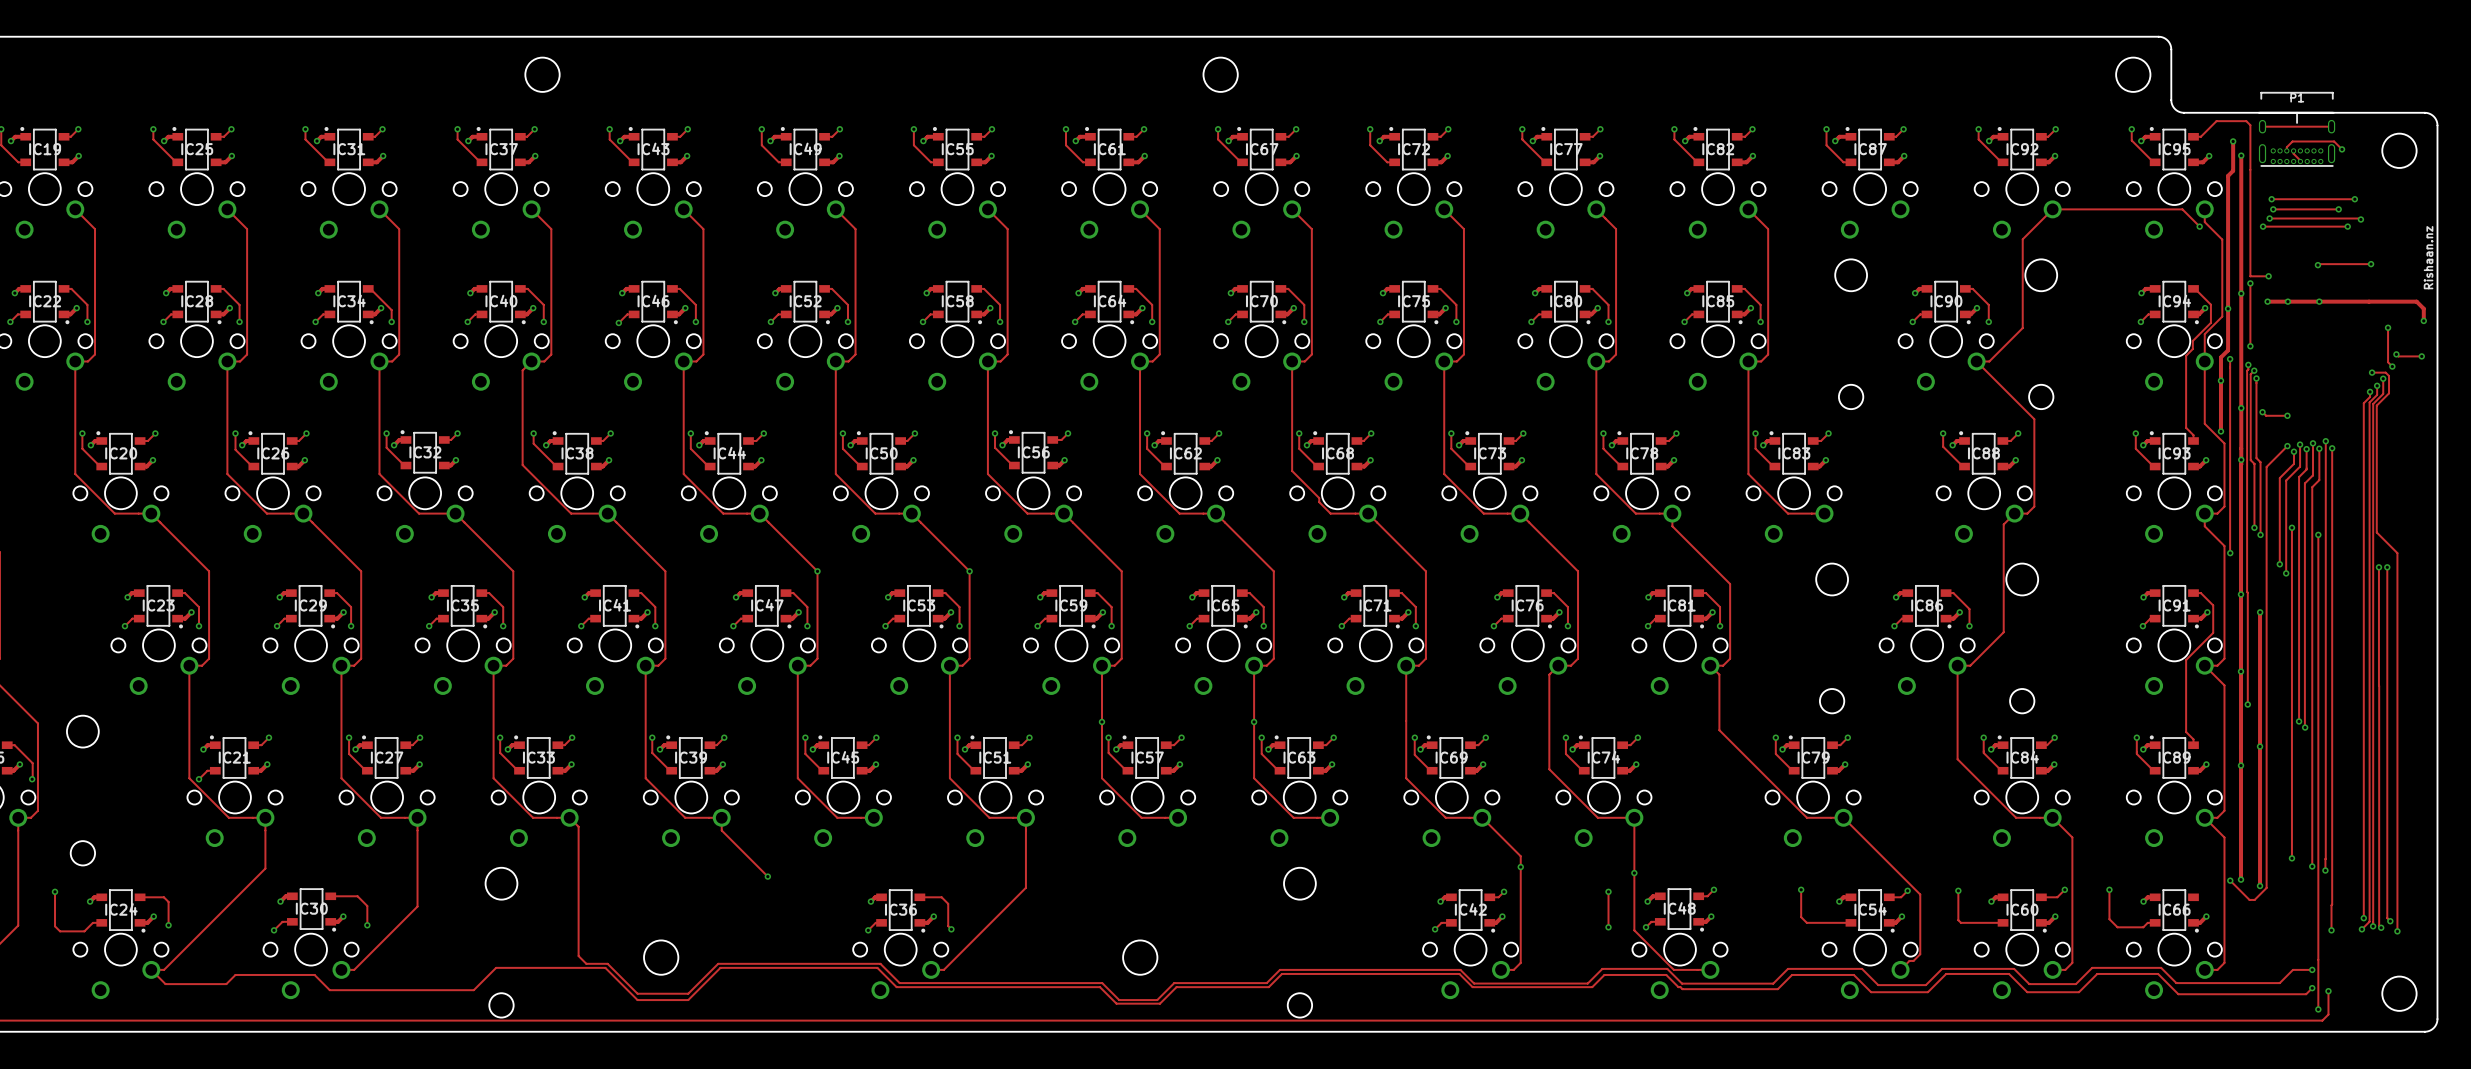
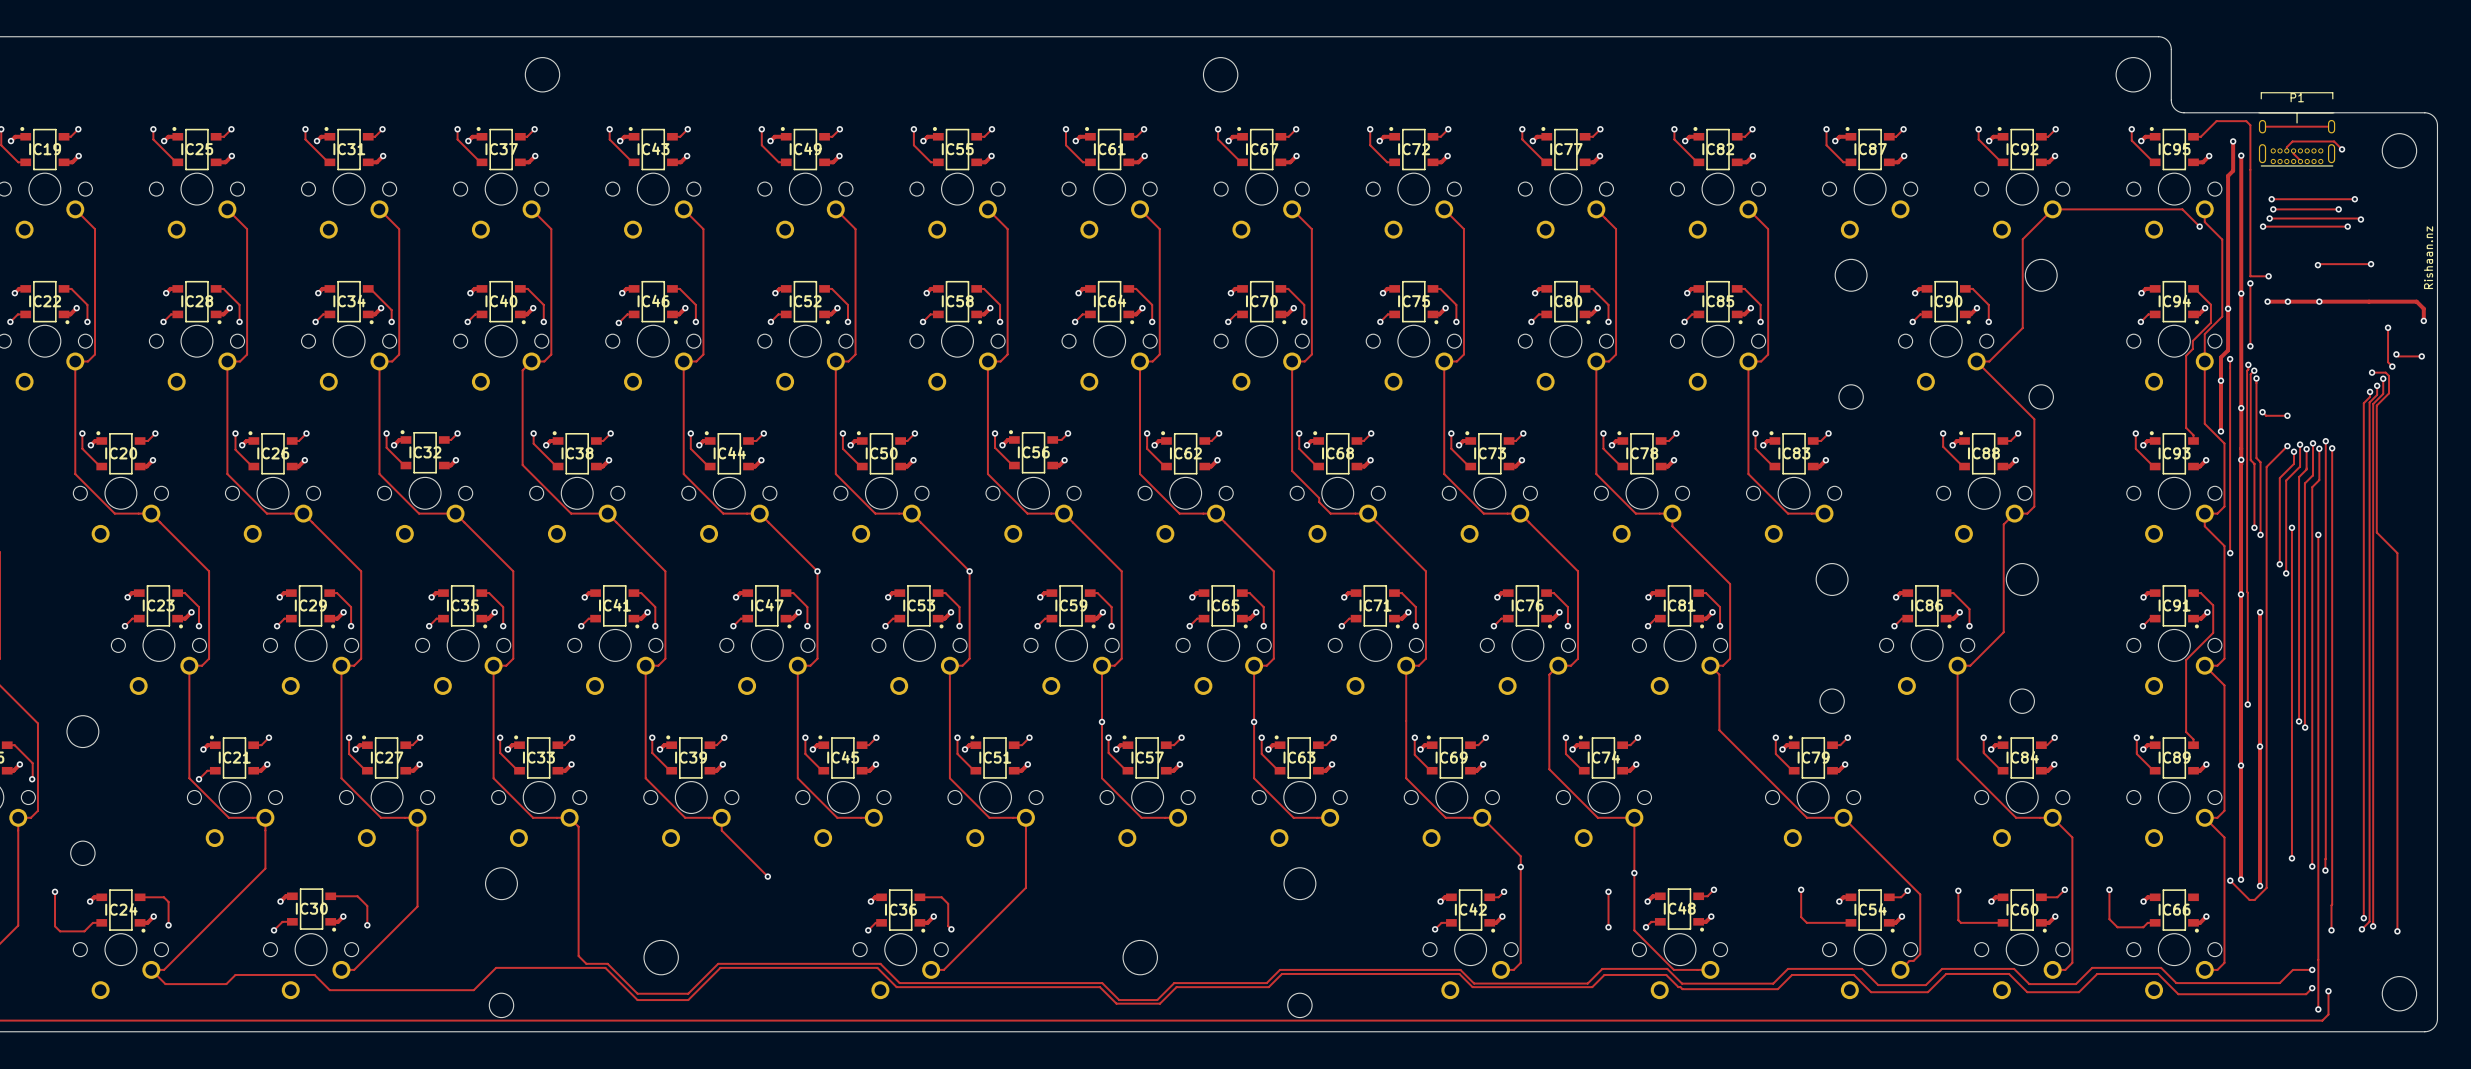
track: (2378, 567) (2379, 925) (2381, 927) -> none
via: (2378, 567) -> none
track: (2387, 567) (2387, 918) (2390, 921) -> none
via: (2387, 567) -> none
via: (2241, 671) -> none
via: (2390, 921) -> none
via: (2381, 927) -> none

